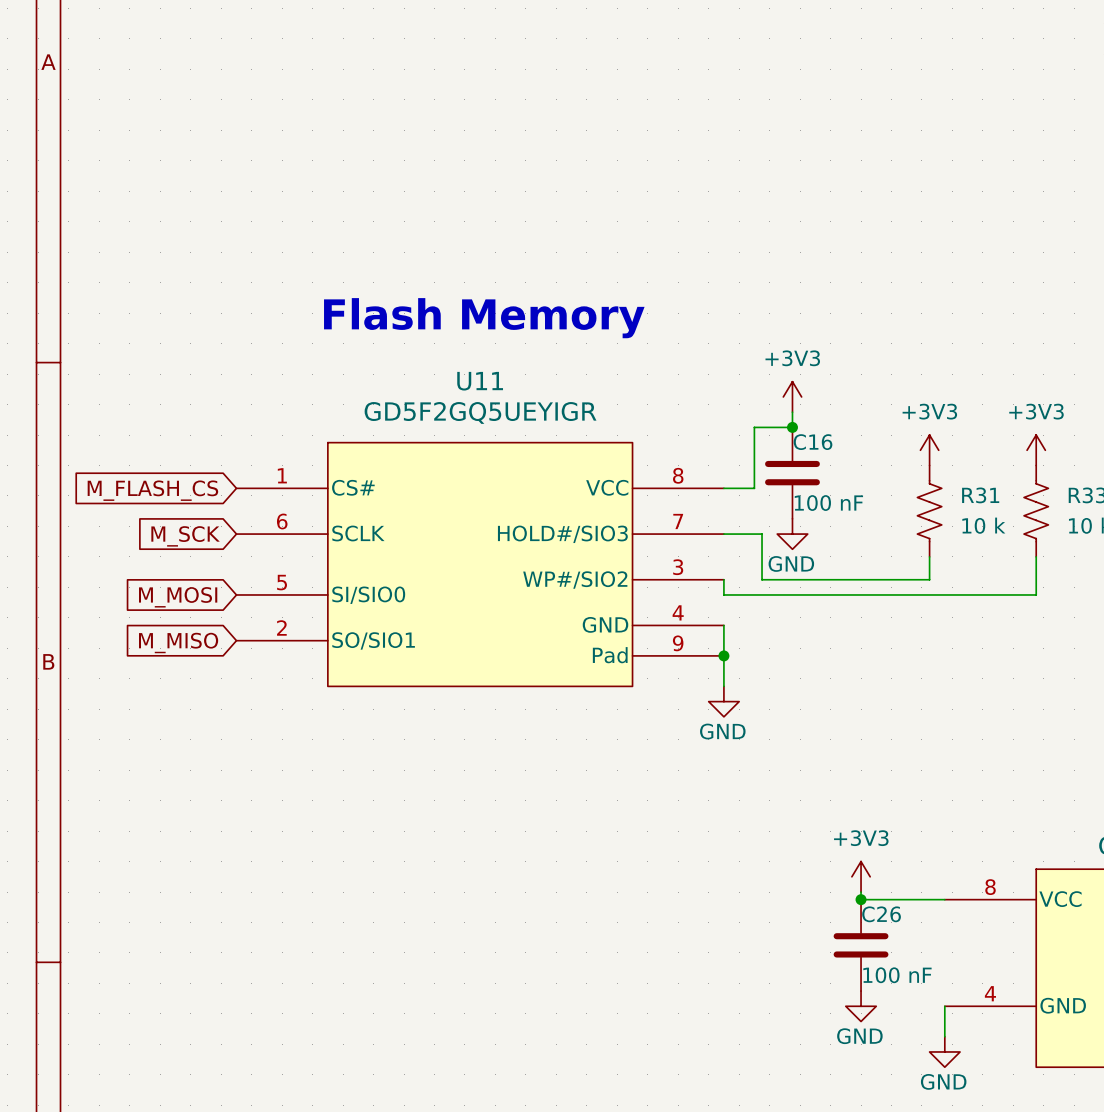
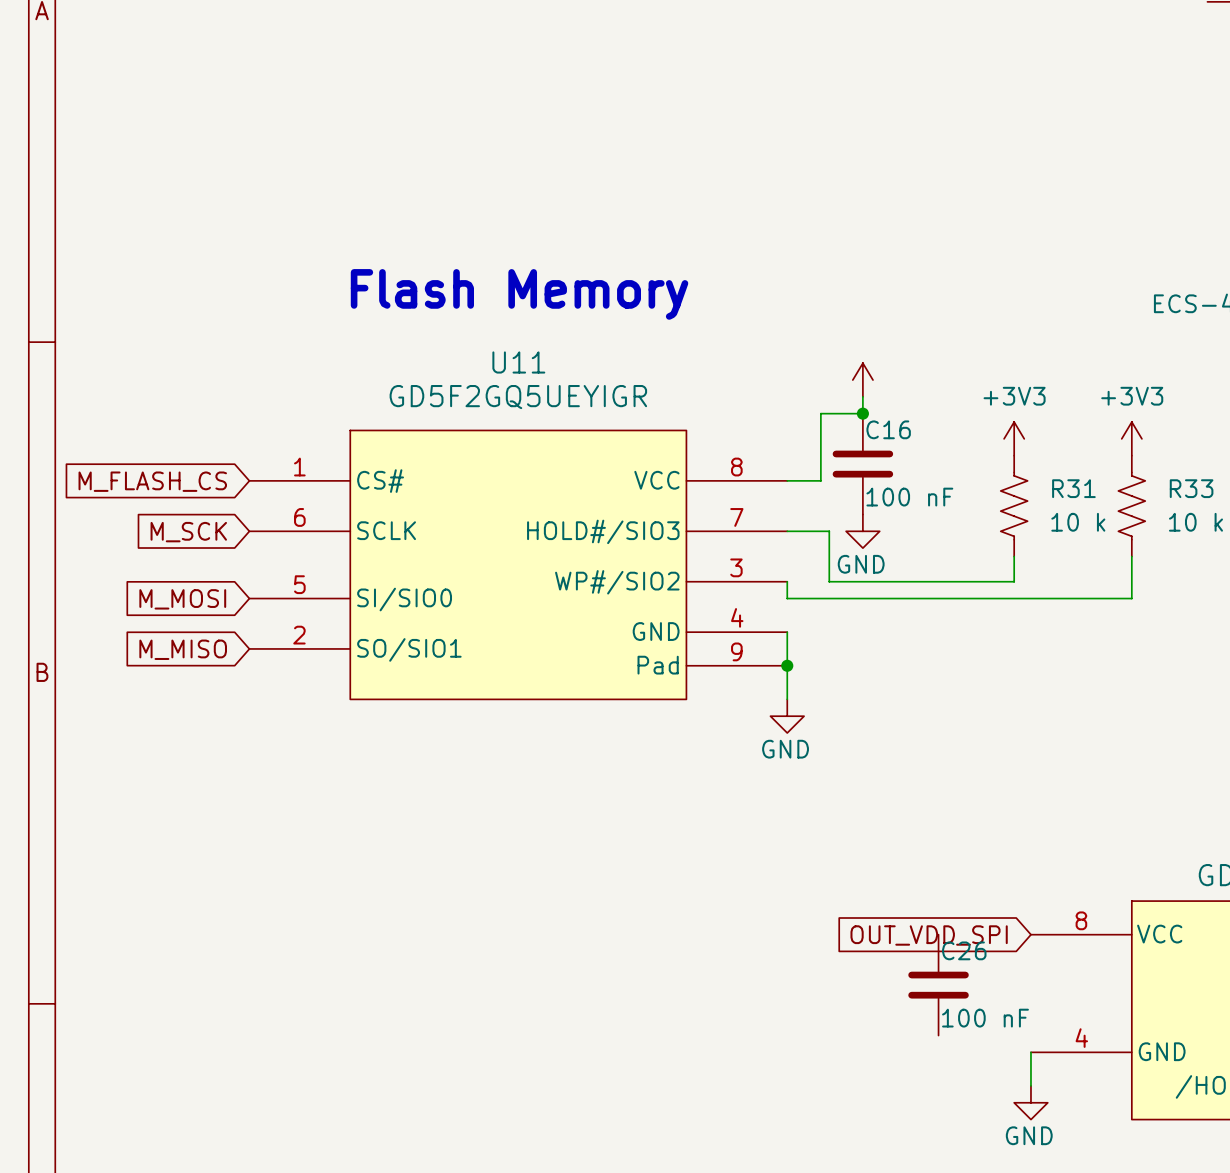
power symbol text: +3V3 (792, 358) -> none
power symbol: +3V3 (861, 876) -> none
wire: (861, 892) (861, 899) (944, 899) -> none
junction: (861, 899) -> none
global label: none -> OUT_VDD_SPI (929, 935)
power symbol: GND (861, 1006) -> none

